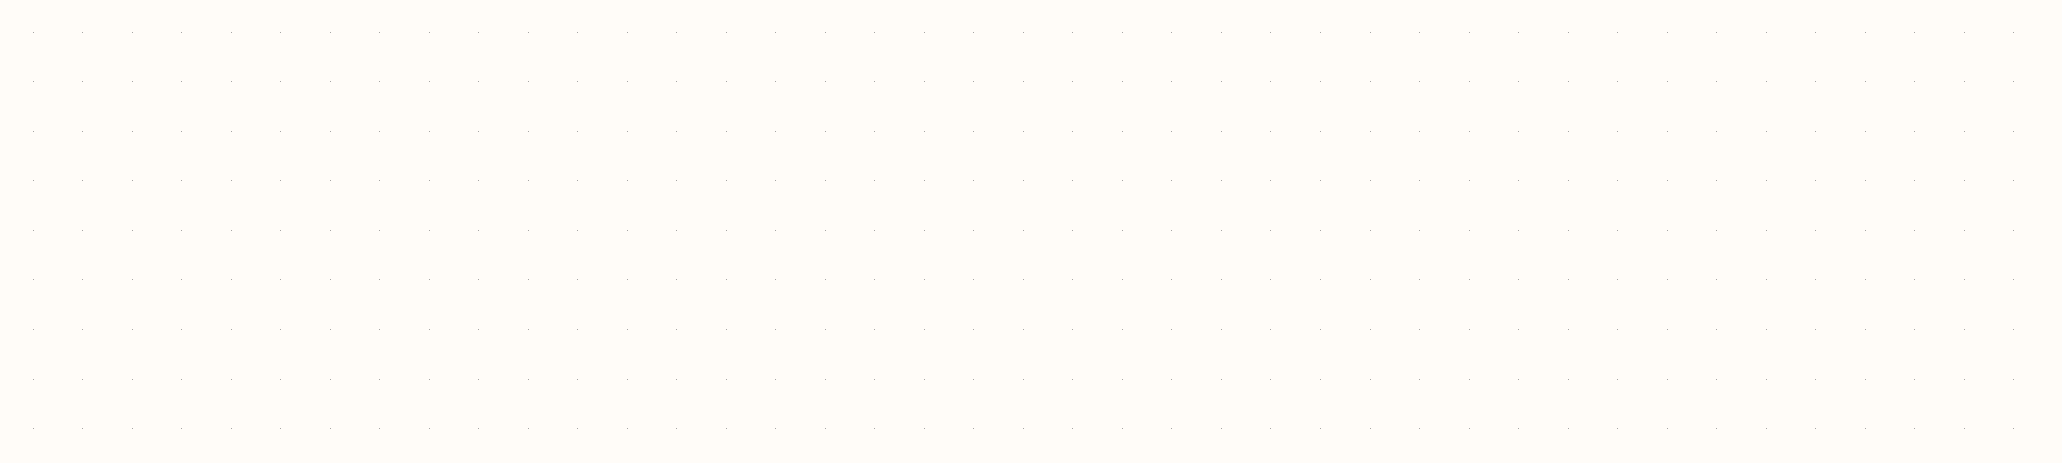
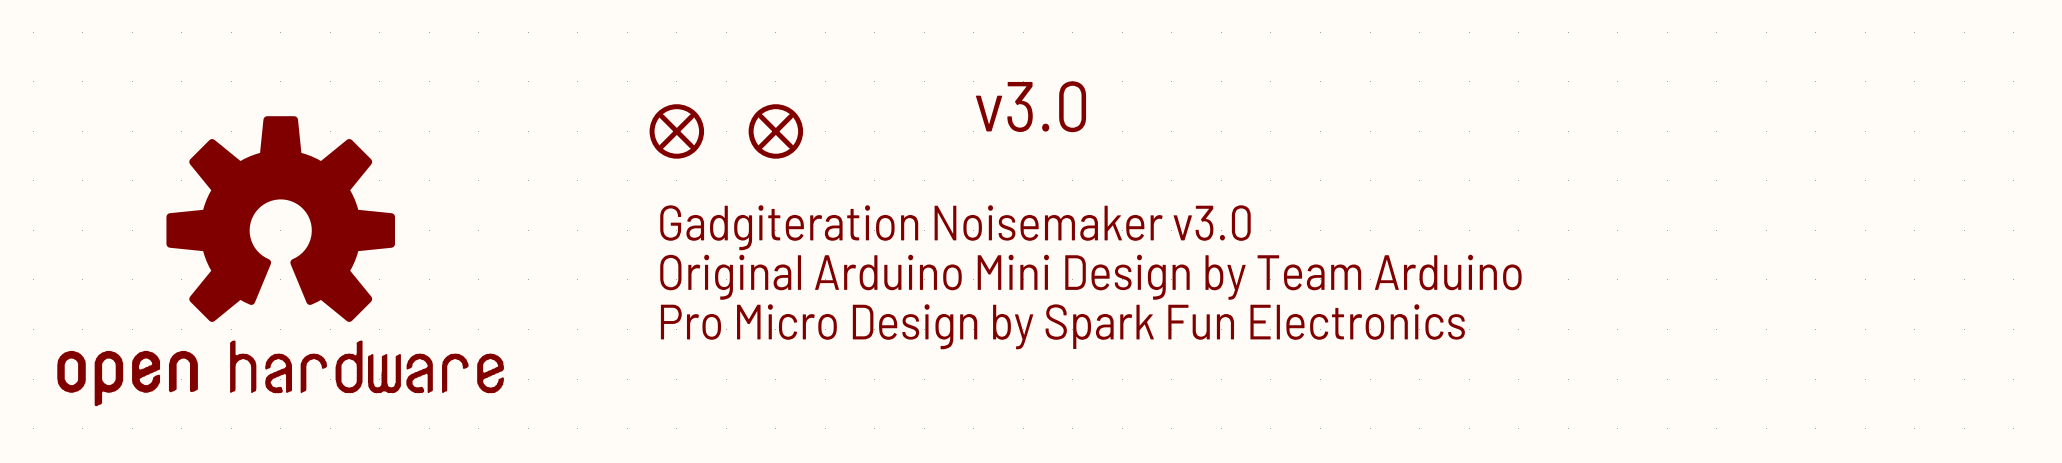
text: none -> v3.0 (1031, 106)
part: none -> (676, 131)
part: none -> (775, 131)
text: none -> Gadgiteration Noisemaker v3.0 (955, 227)
part: none -> (280, 261)
text: none -> Original Arduino Mini Design by Team Arduino (1090, 277)
text: none -> Pro Micro Design by Spark Fun Electronics (1062, 326)

